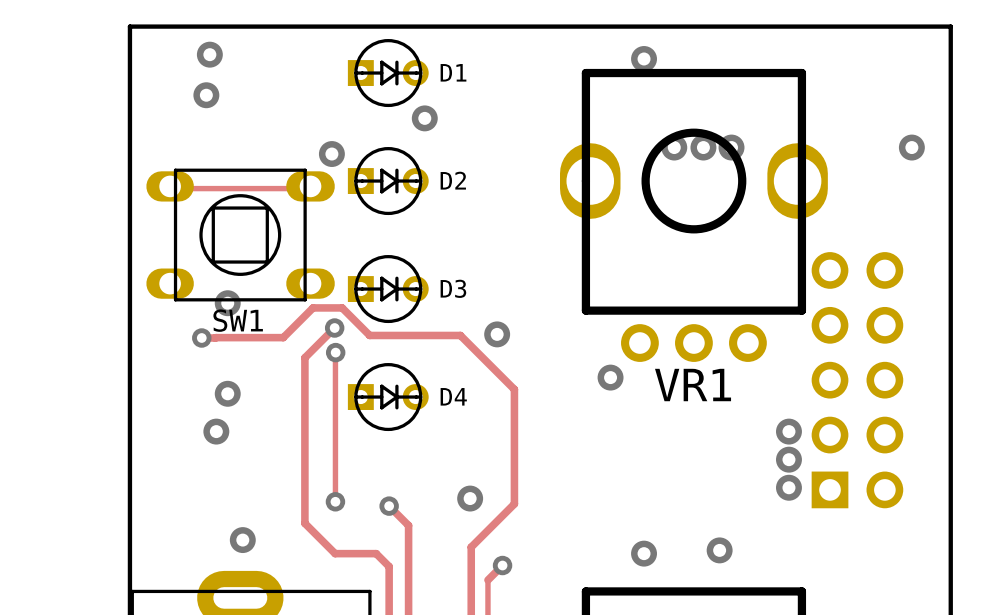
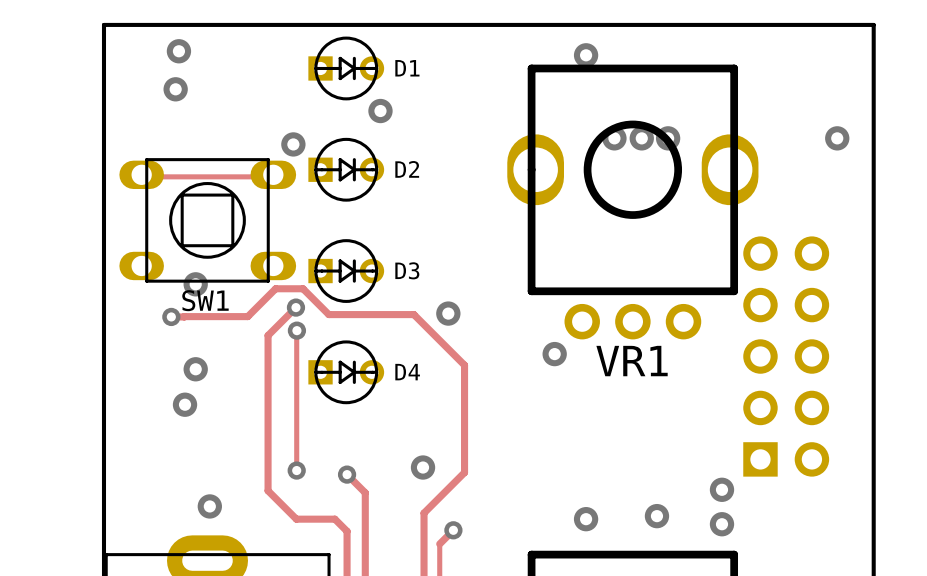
via: (788, 431) -> none
via: (788, 459) -> none
via: (788, 487) -> none
via: none -> (721, 489)
via: none -> (721, 524)

